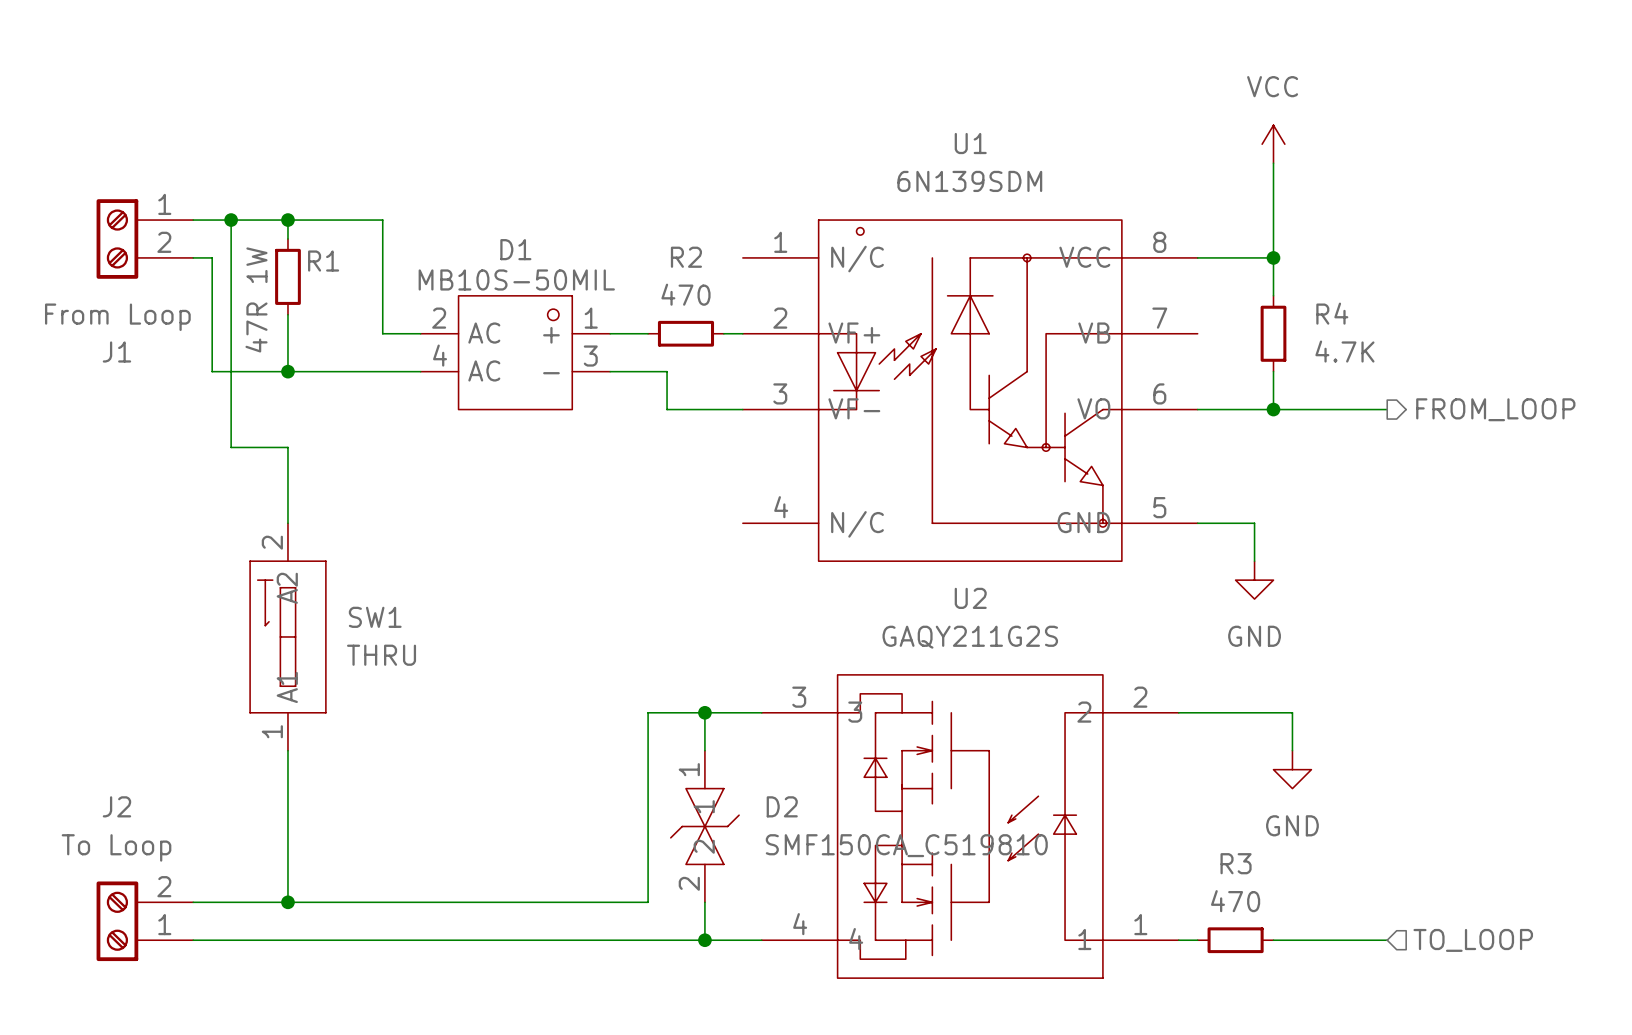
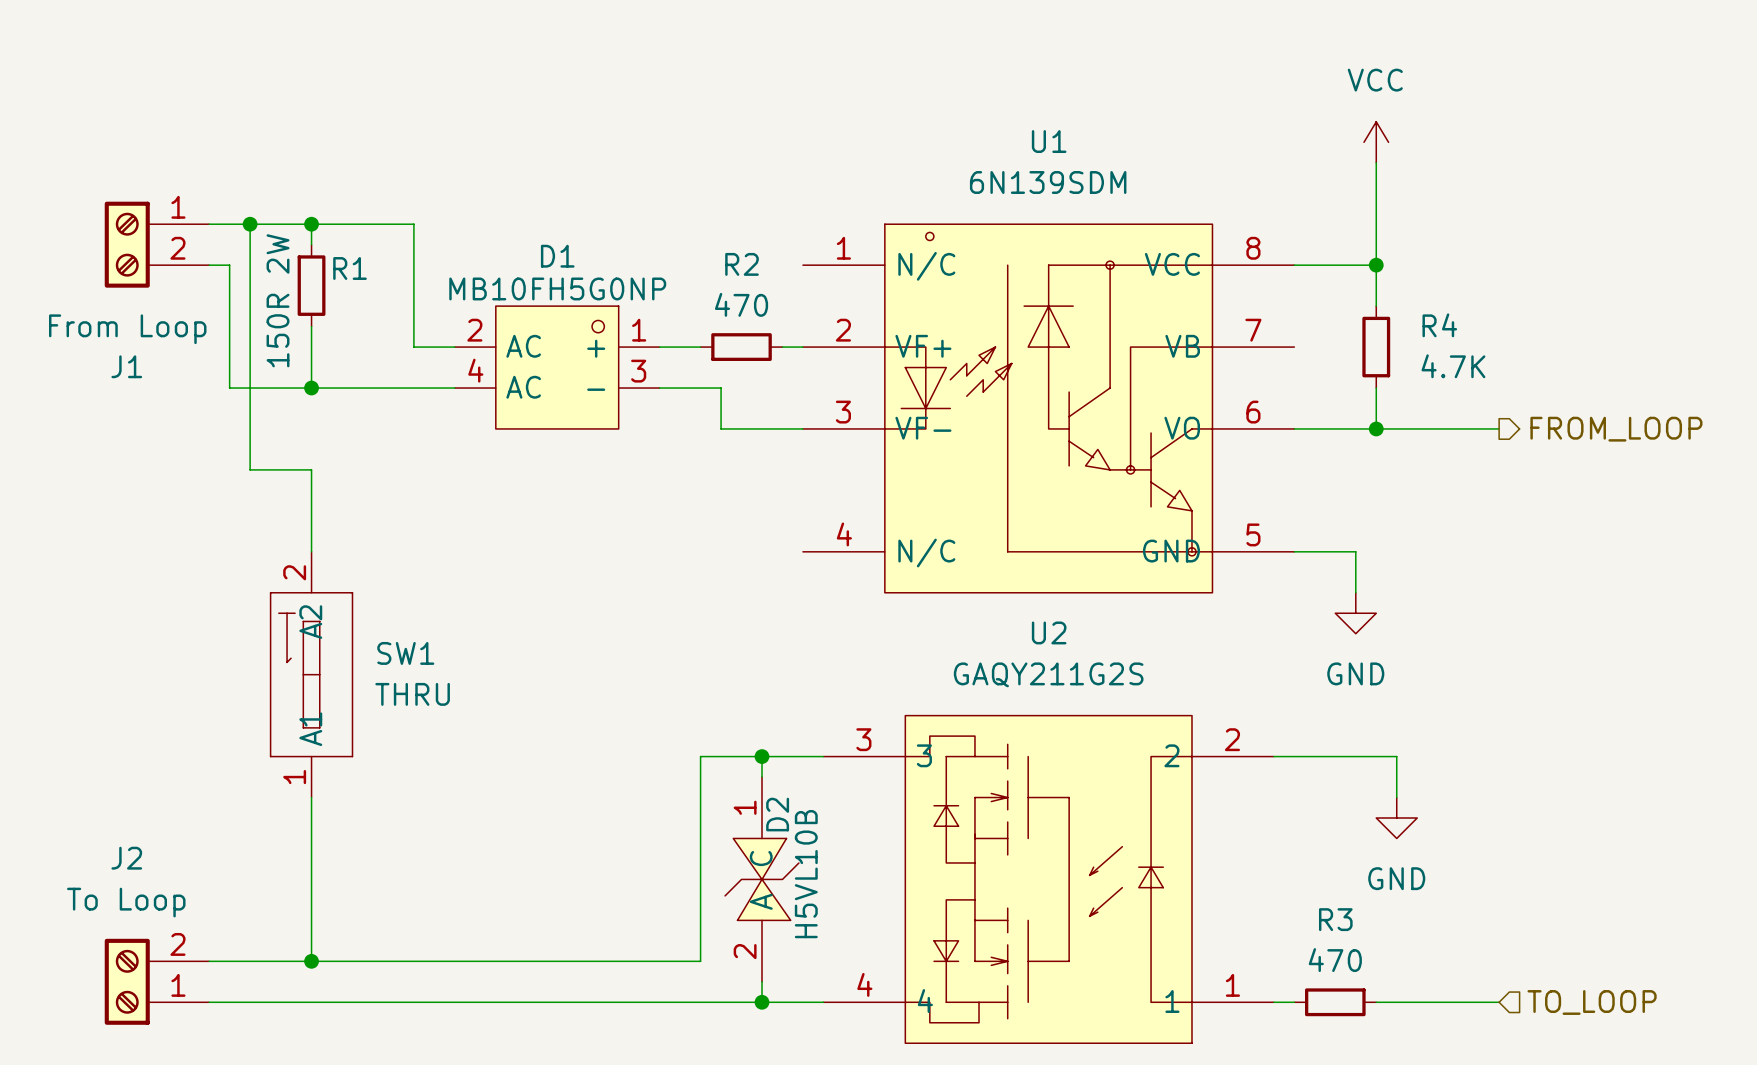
D1 value: MB10S-50MIL (516, 279) -> MB10FH5G0NP (557, 288)
R1 value: 47R 1W (256, 299) -> 150R 2W (278, 300)
D2 symbol: [670, 750, 740, 903] -> [725, 777, 799, 982]
D2 name position: D2 (782, 806) -> D2 (777, 814)
D2 value: SMF150CA_C519810 (906, 845) -> H5VL10B (806, 874)

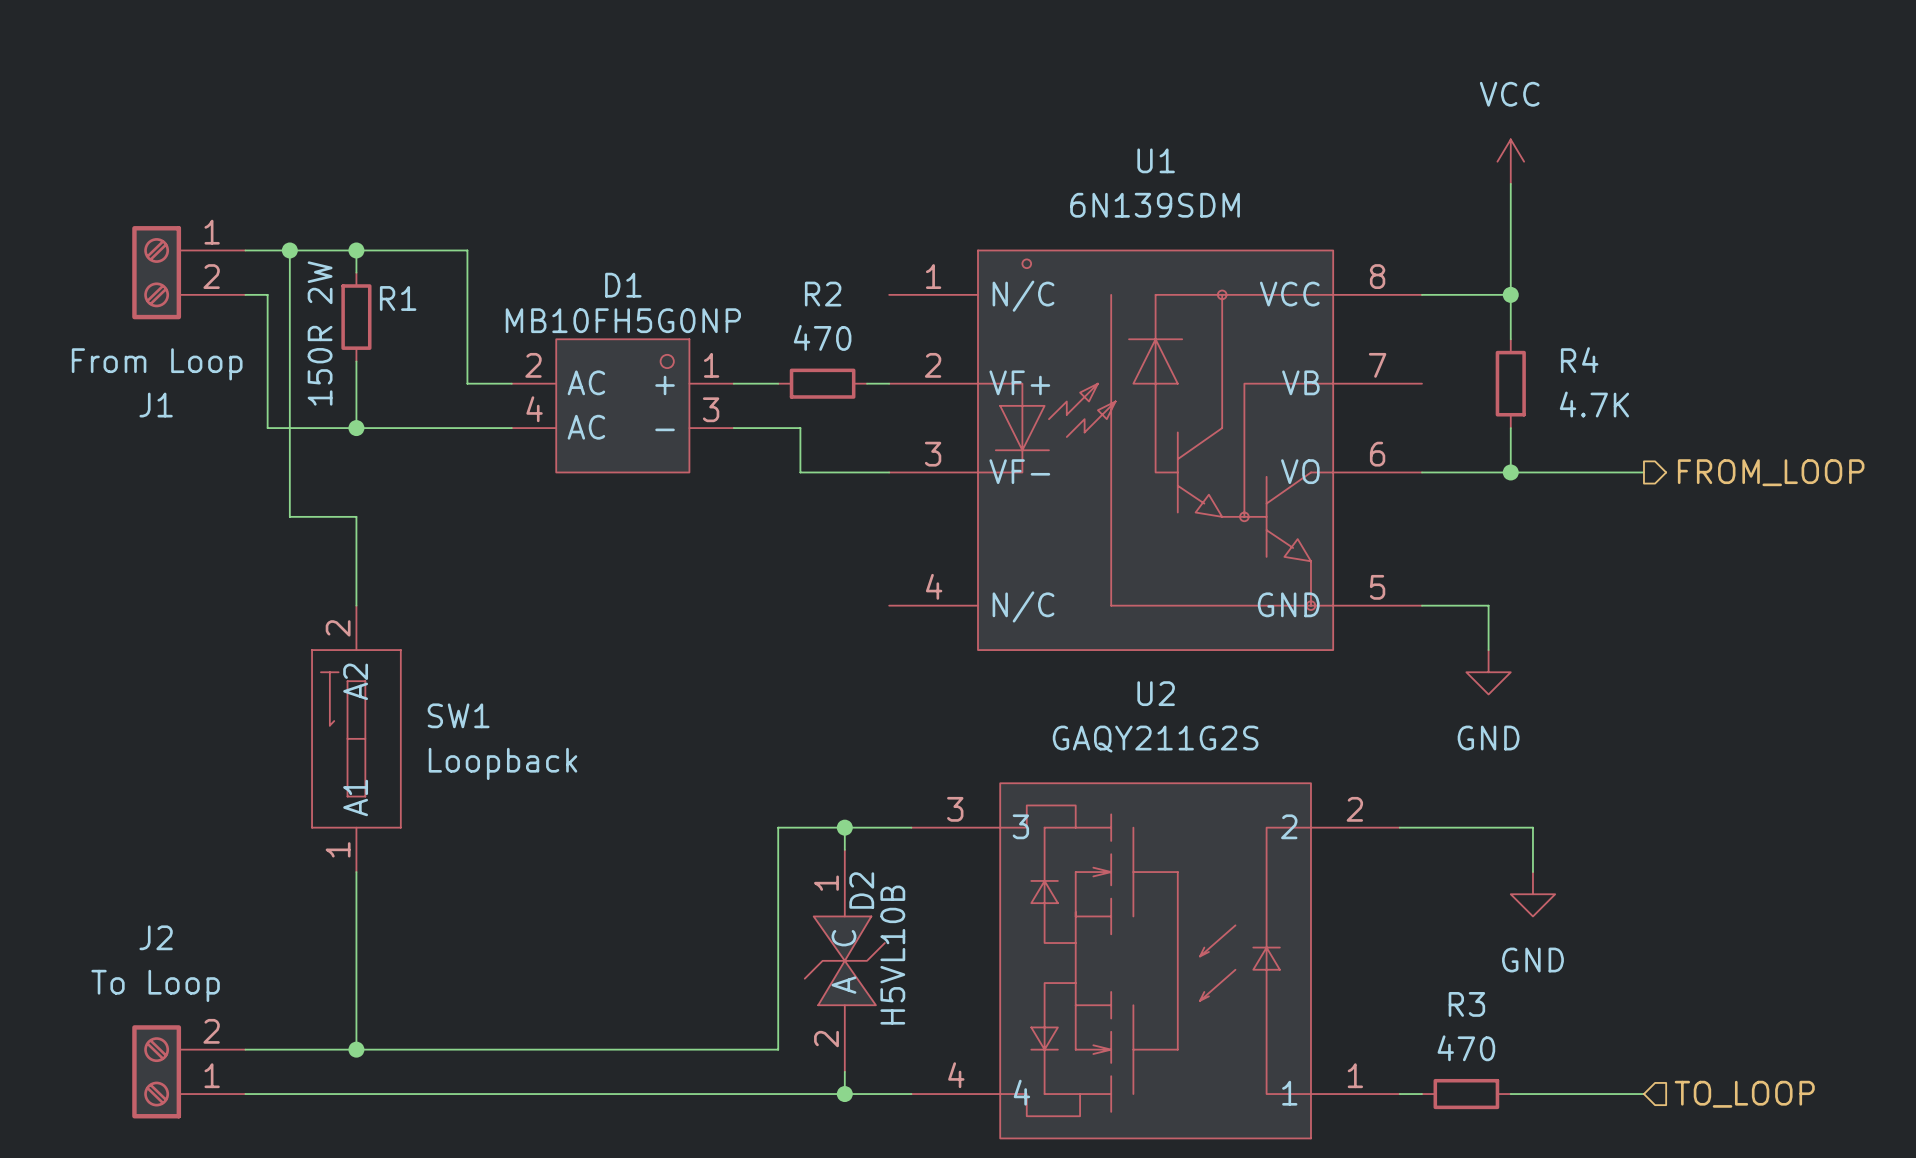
SW1 value: THRU (412, 694) -> Loopback (503, 763)

